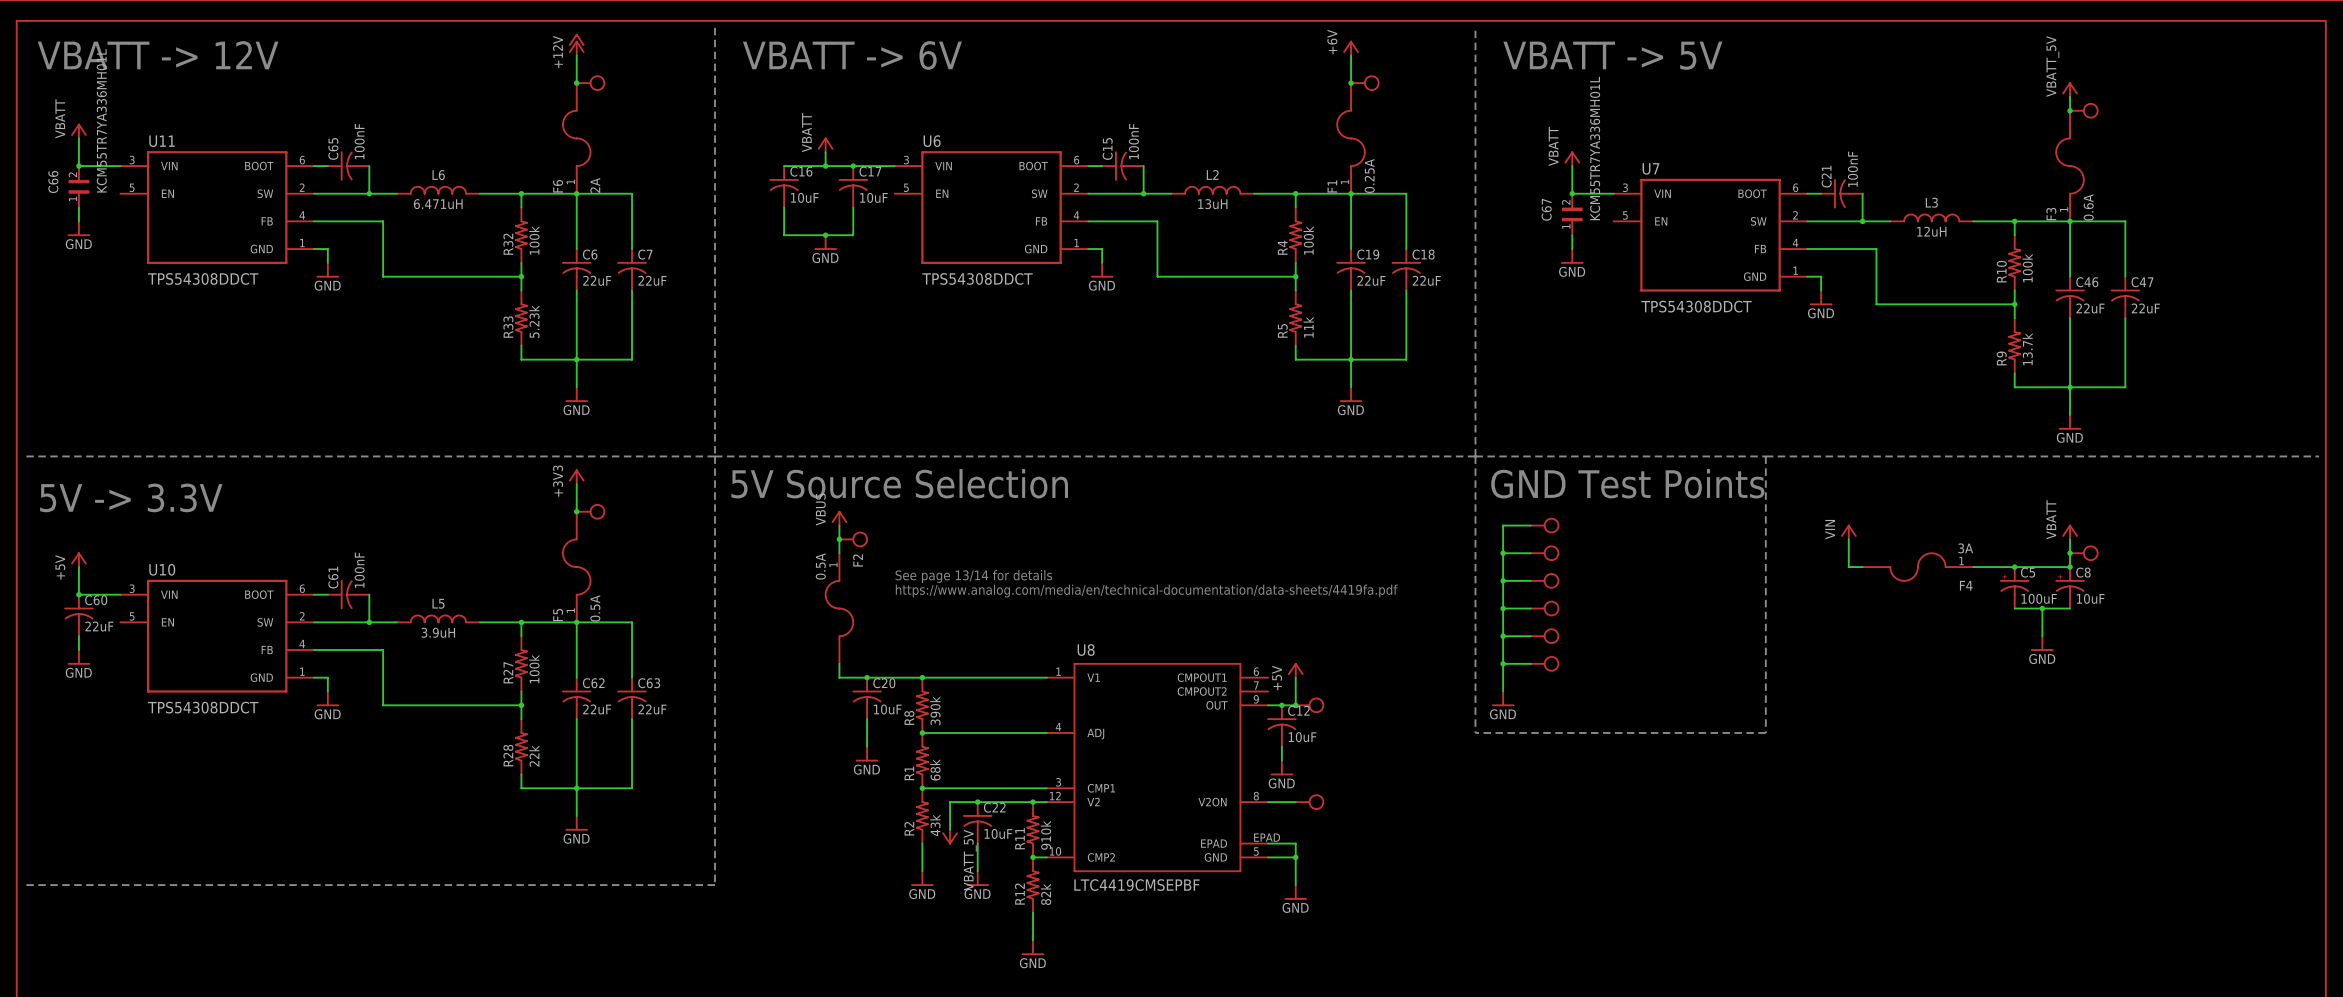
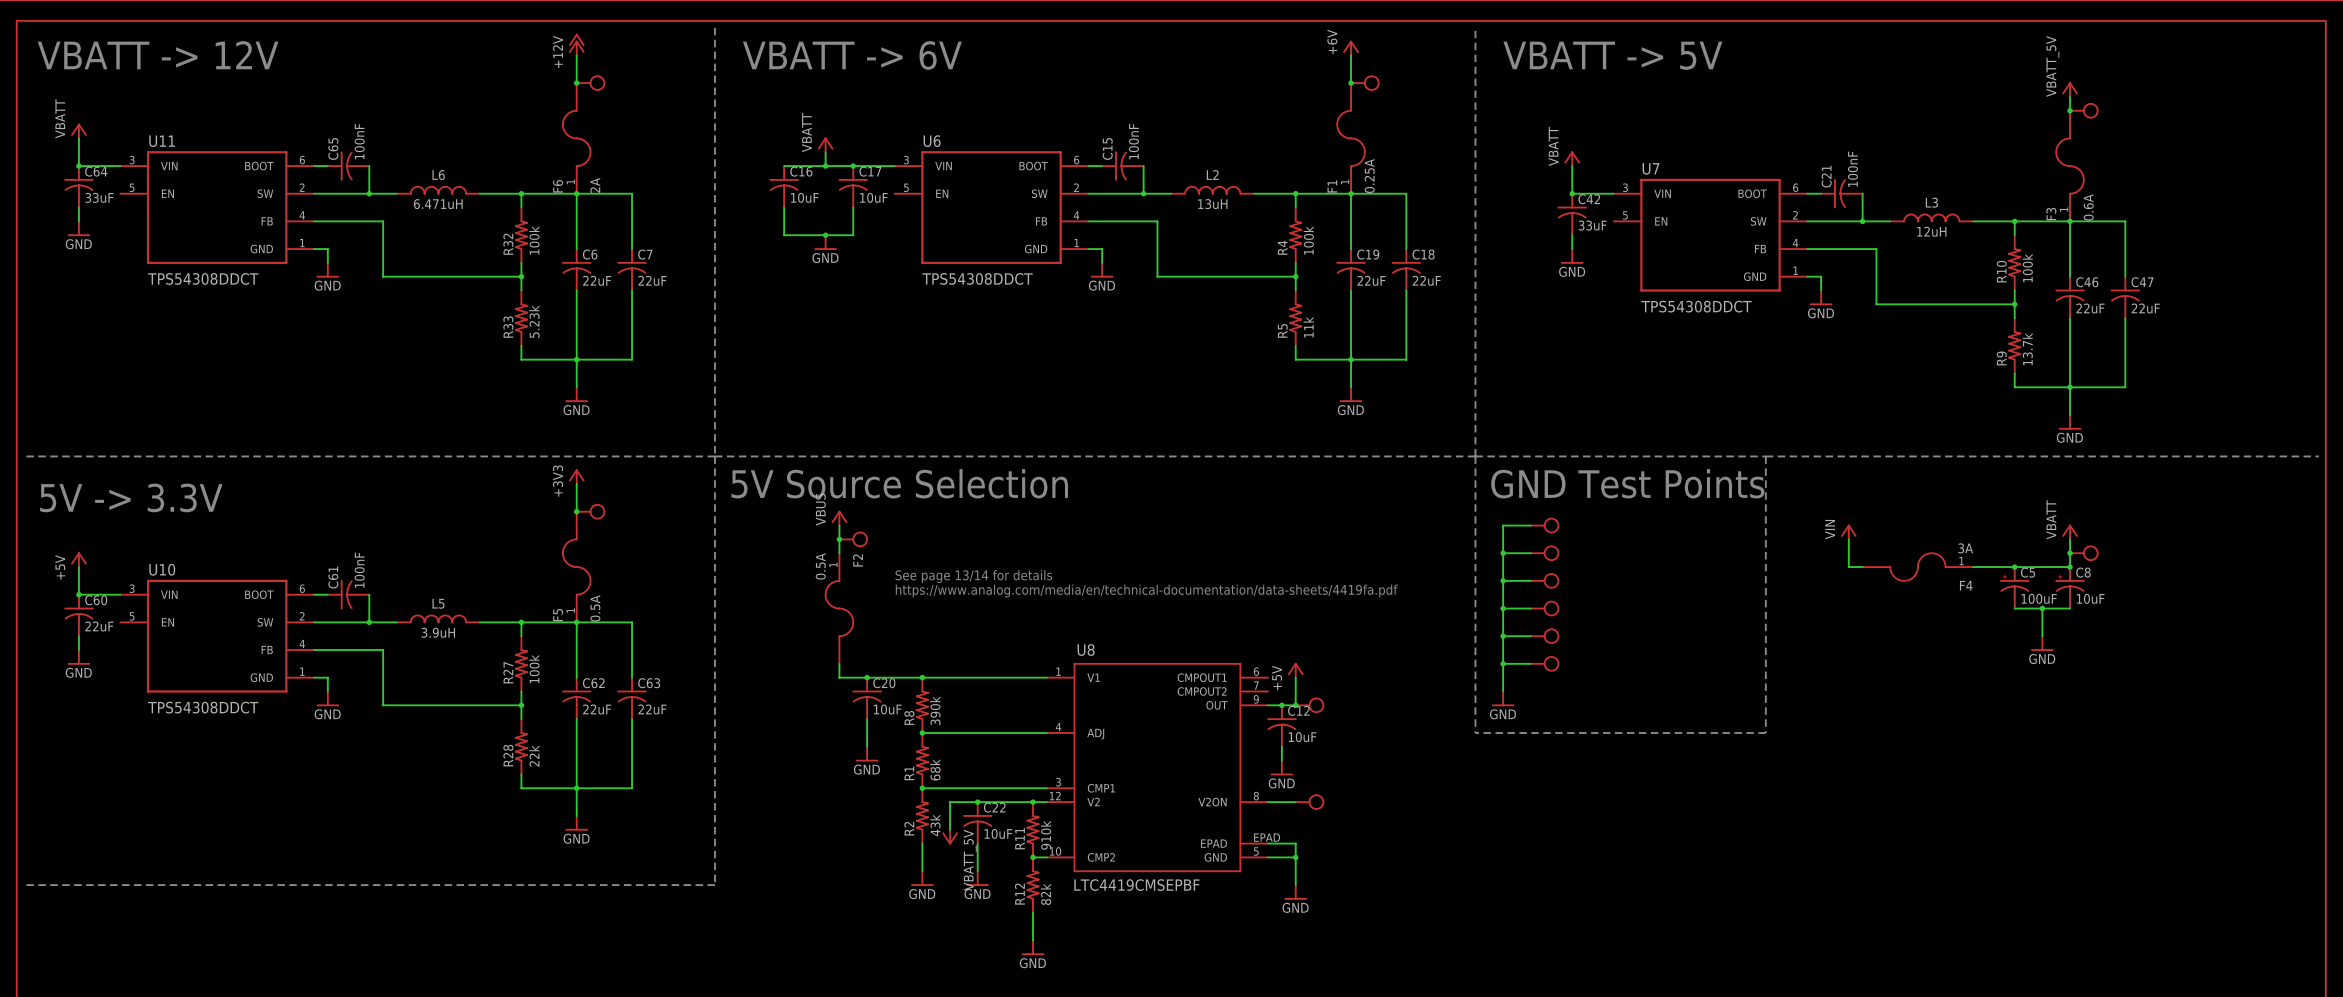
C66: KCM55TR7YA336MH01L (78, 186) -> none
C64: none -> 33uF (78, 186)
C67: KCM55TR7YA336MH01L (1572, 214) -> none
C42: none -> 33uF (1572, 214)

